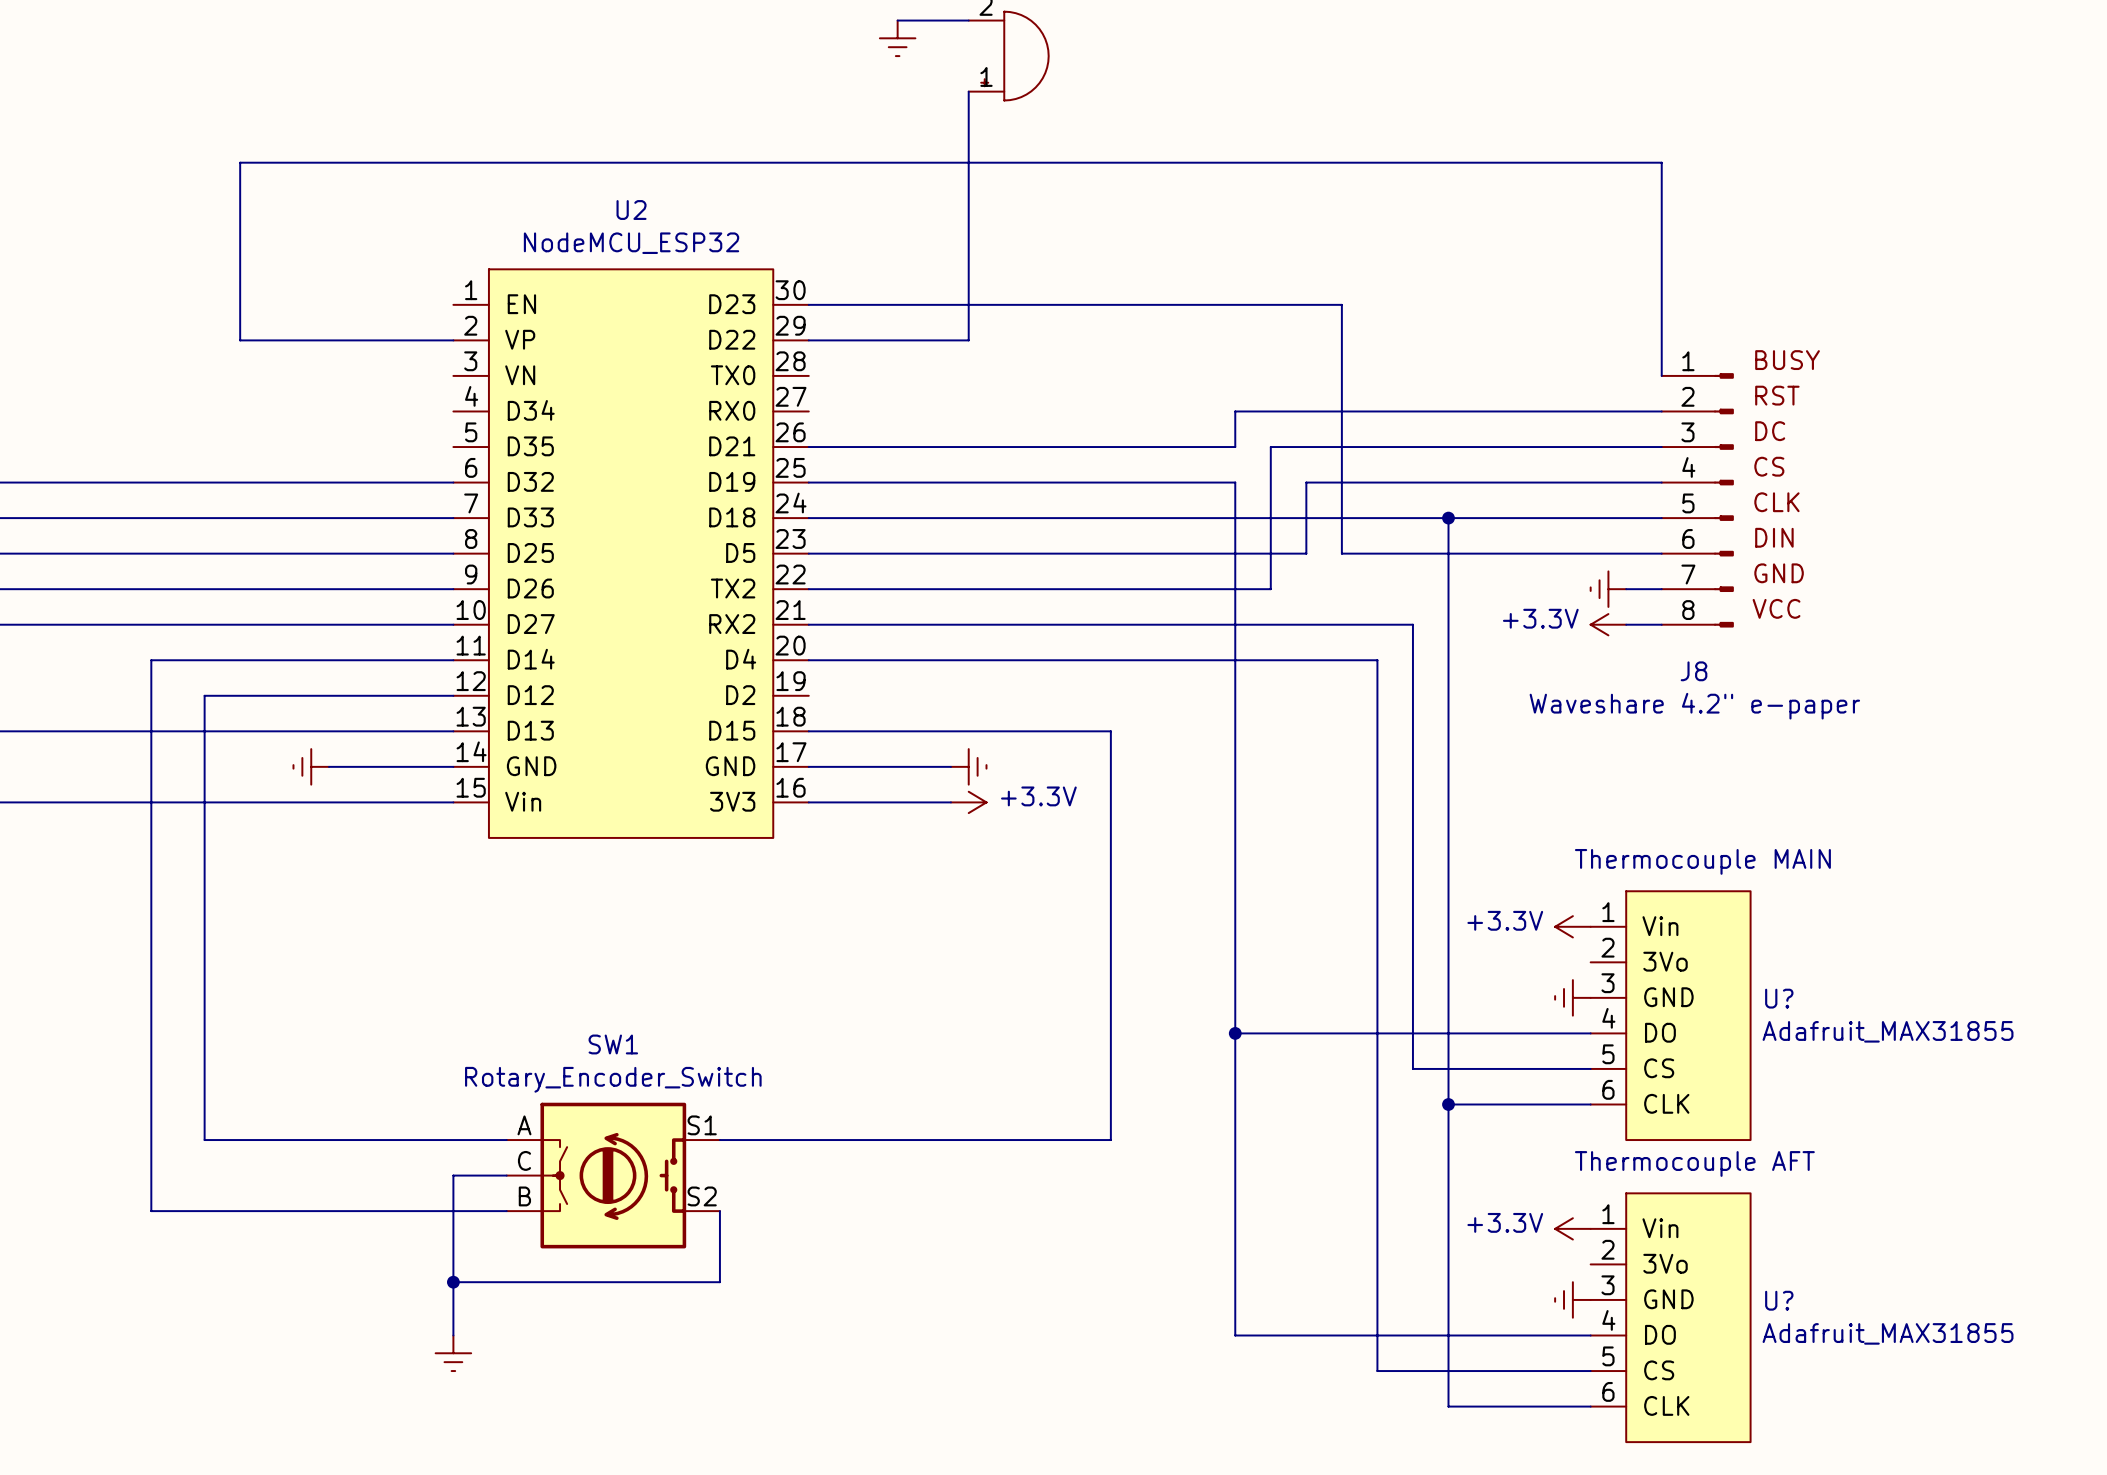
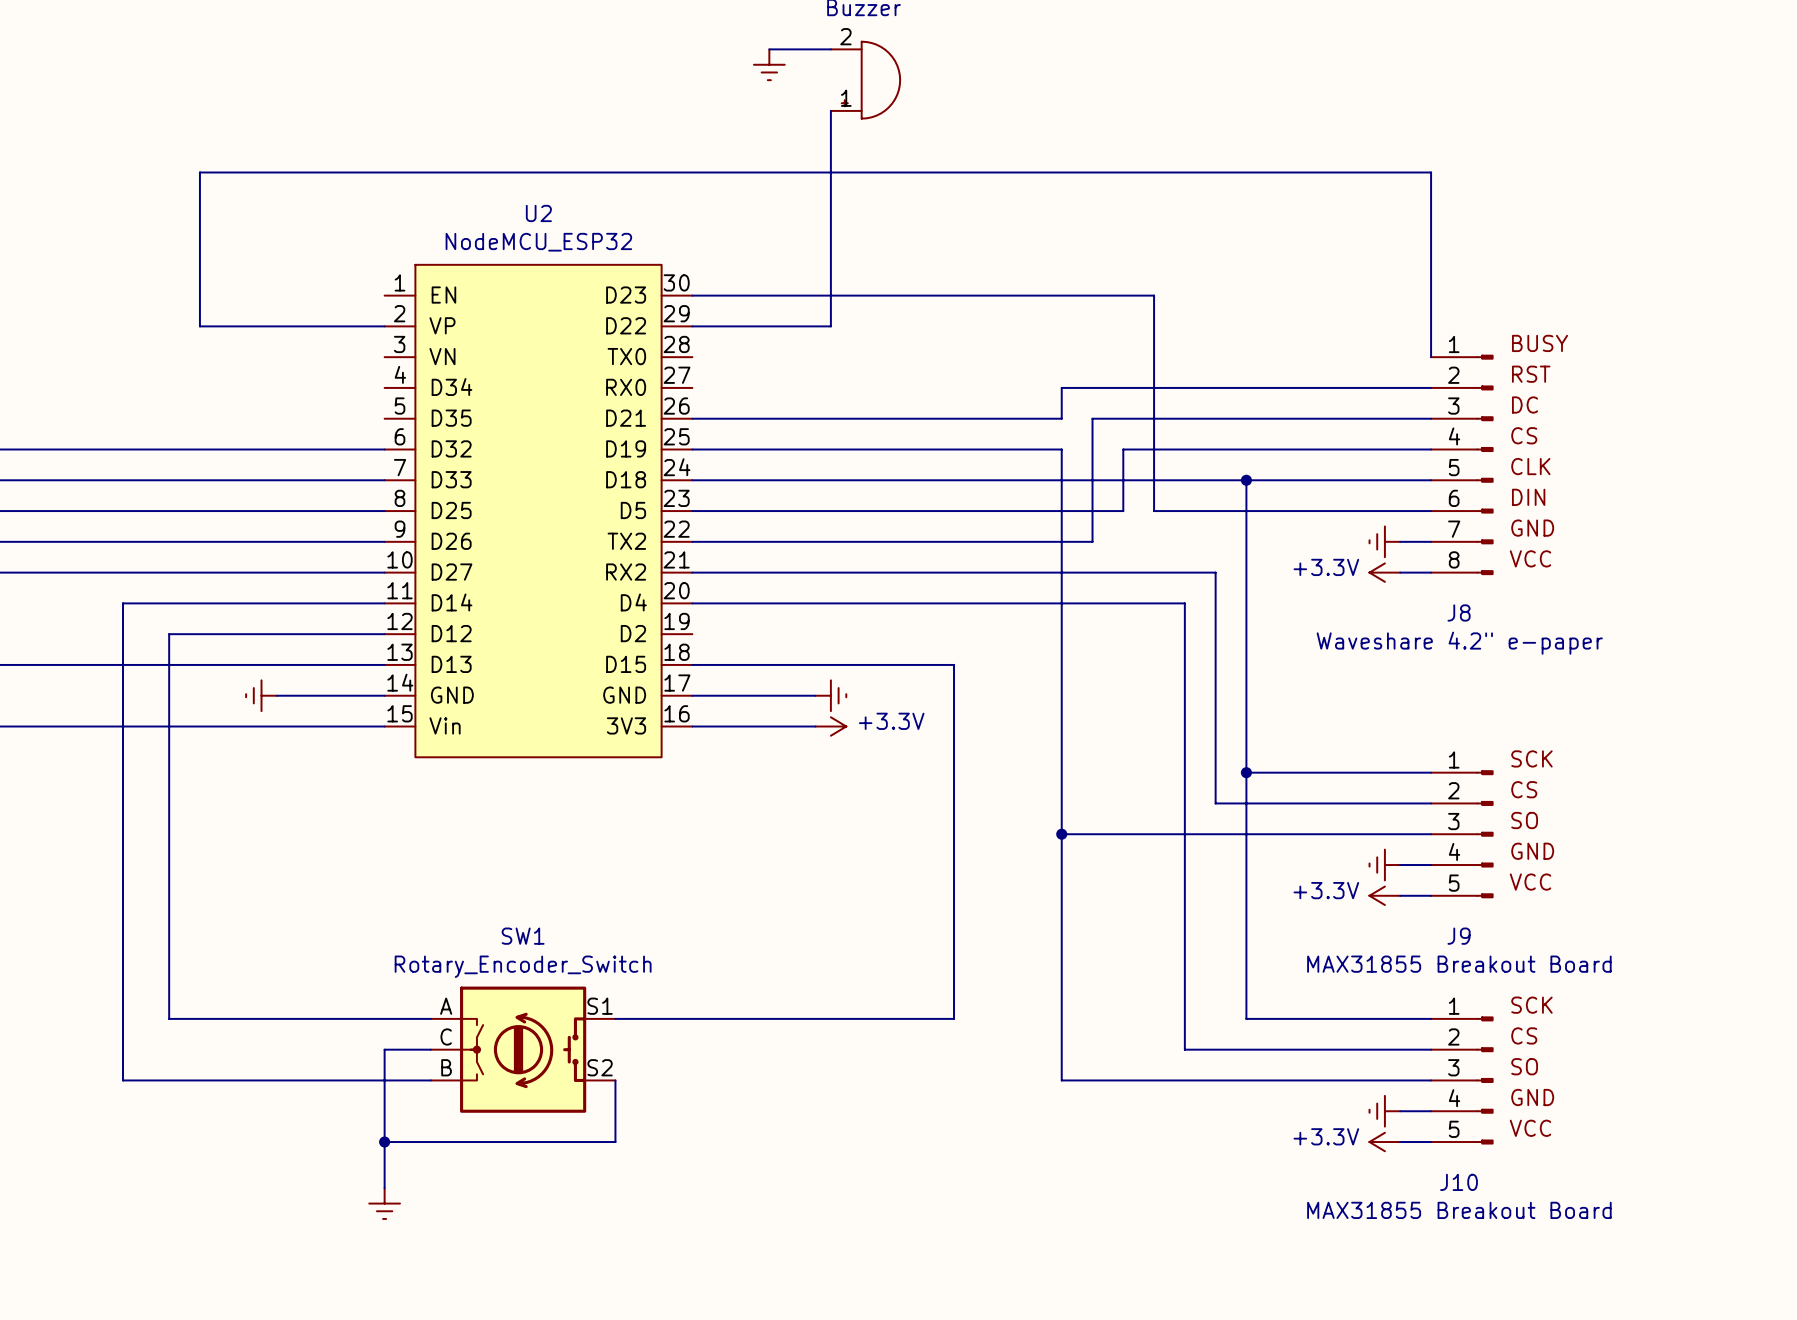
label: none -> SCK (1531, 758)
wire: none -> (1246, 772) (1431, 772)
junction: none -> (1246, 772)
text: Thermocouple MAIN (1702, 861) -> none
label: none -> CS (1524, 789)
wire: (1412, 891) (1412, 1068) (1590, 1068) -> (1215, 803) (1431, 803)
label: none -> SO (1524, 820)
wire: none -> (1061, 834) (1431, 834)
junction: none -> (1061, 834)
power symbol position: +3.3V (1572, 926) -> +3.3V (1384, 895)
J9: none -> MAX31855 Breakout Board (1462, 834)
label: none -> GND (1532, 851)
label: none -> VCC (1530, 882)
power symbol position: (1572, 997) -> (1384, 865)
U?: Adafruit_MAX31855 (1670, 1015) -> none
wire: (1235, 1033) (1590, 1033) -> none
junction: (1235, 1033) -> none
wire: (1448, 1104) (1590, 1104) -> none
junction: (1448, 1104) -> none
label: none -> SCK (1531, 1005)
wire: (1448, 1140) (1448, 1406) (1590, 1406) -> (1246, 1018) (1431, 1018)
label: none -> CS (1524, 1035)
text: Thermocouple AFT (1694, 1163) -> none
wire: (1377, 1175) (1377, 1371) (1590, 1371) -> (1184, 1049) (1431, 1049)
label: none -> SO (1524, 1066)
wire: (1235, 1211) (1235, 1335) (1590, 1335) -> (1061, 1080) (1431, 1080)
J10: none -> MAX31855 Breakout Board (1462, 1080)
power symbol position: +3.3V (1572, 1228) -> +3.3V (1384, 1142)
label: none -> GND (1532, 1097)
label: none -> VCC (1530, 1128)
power symbol position: (1572, 1299) -> (1384, 1111)
U?: Adafruit_MAX31855 (1670, 1317) -> none

